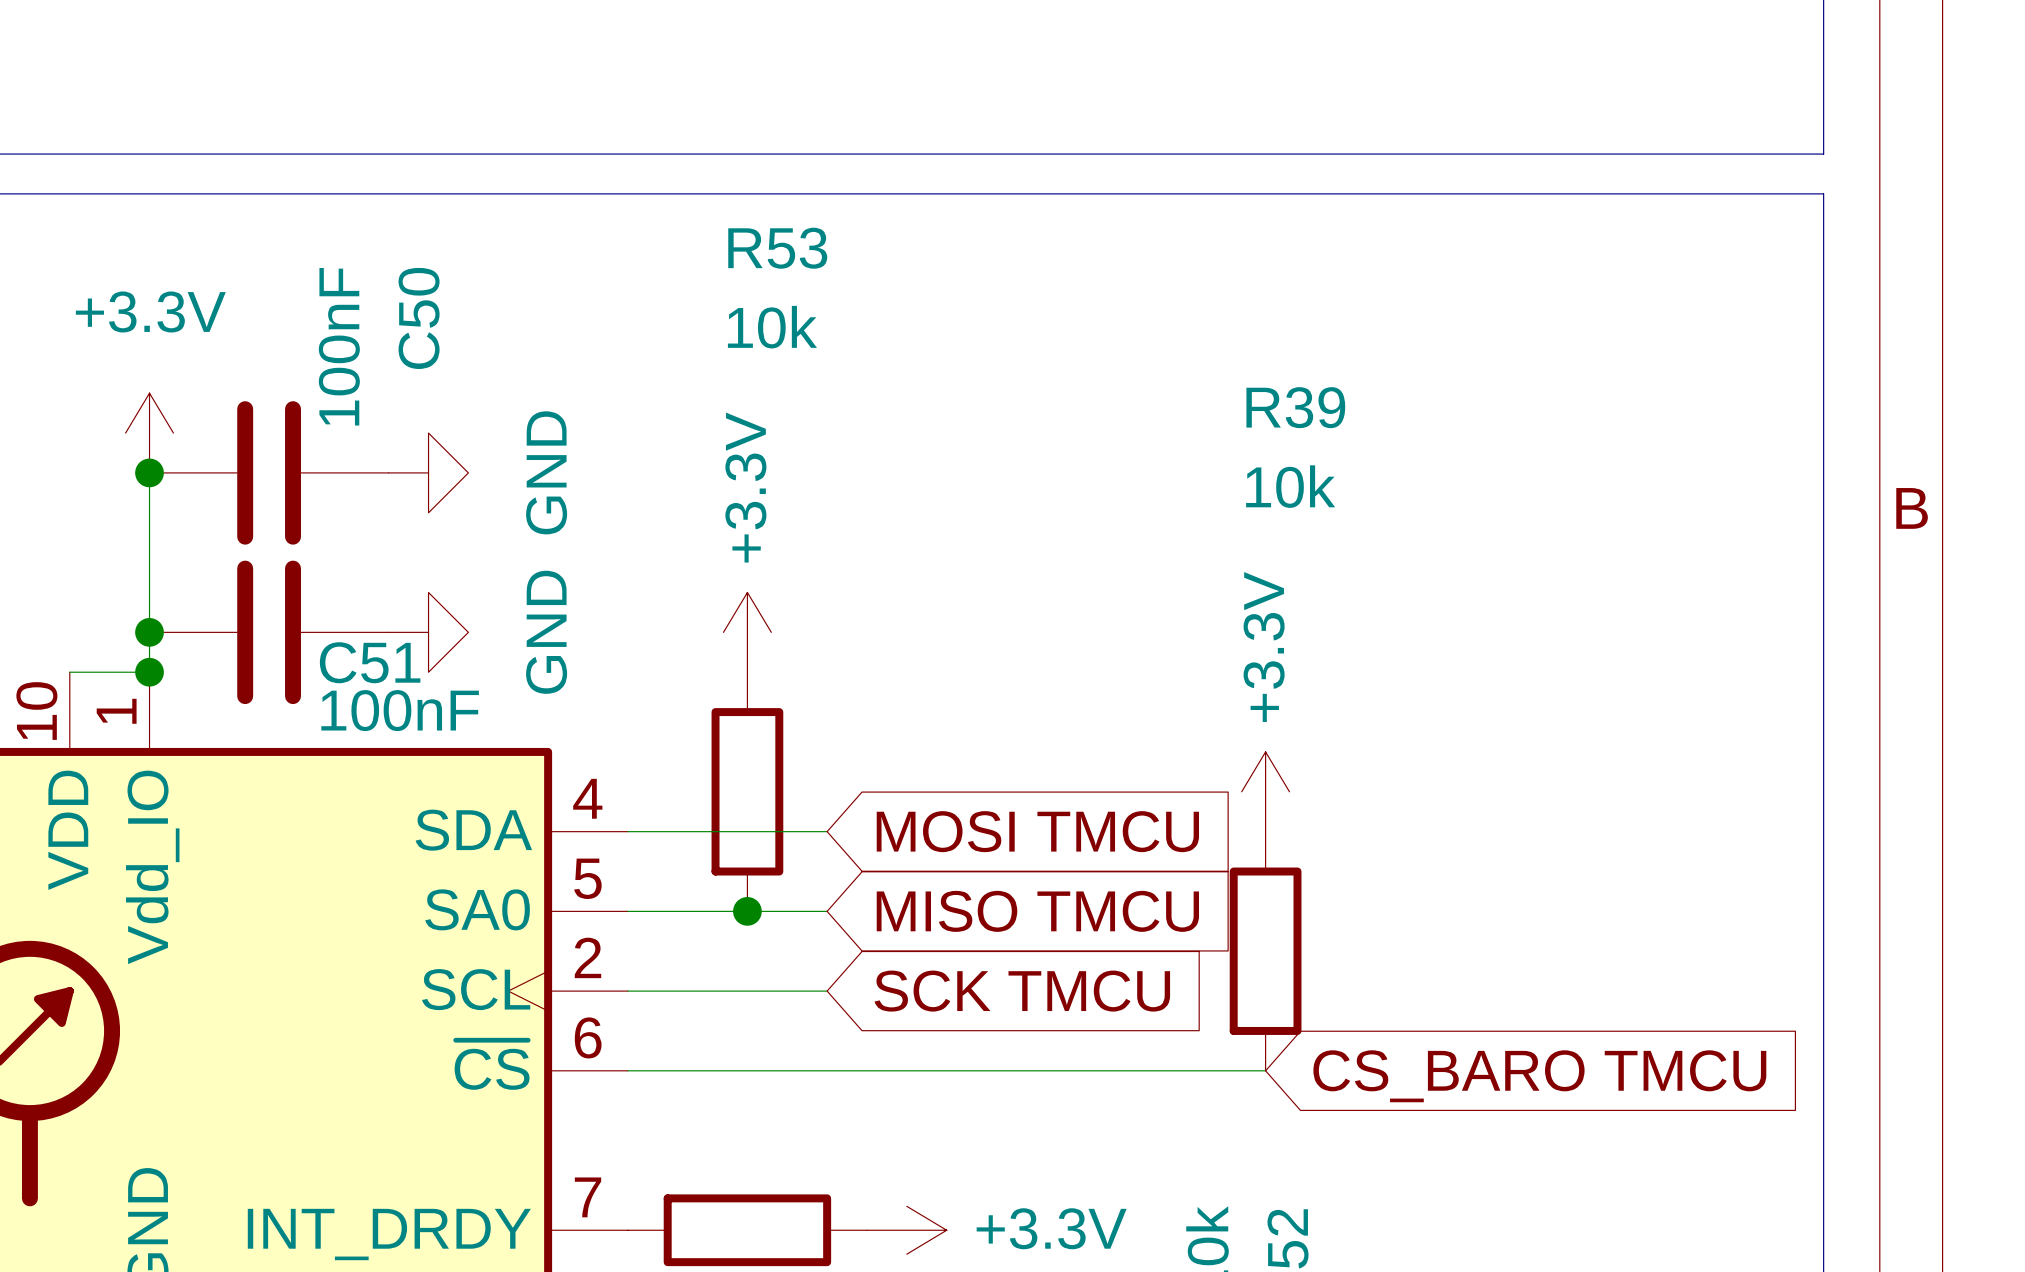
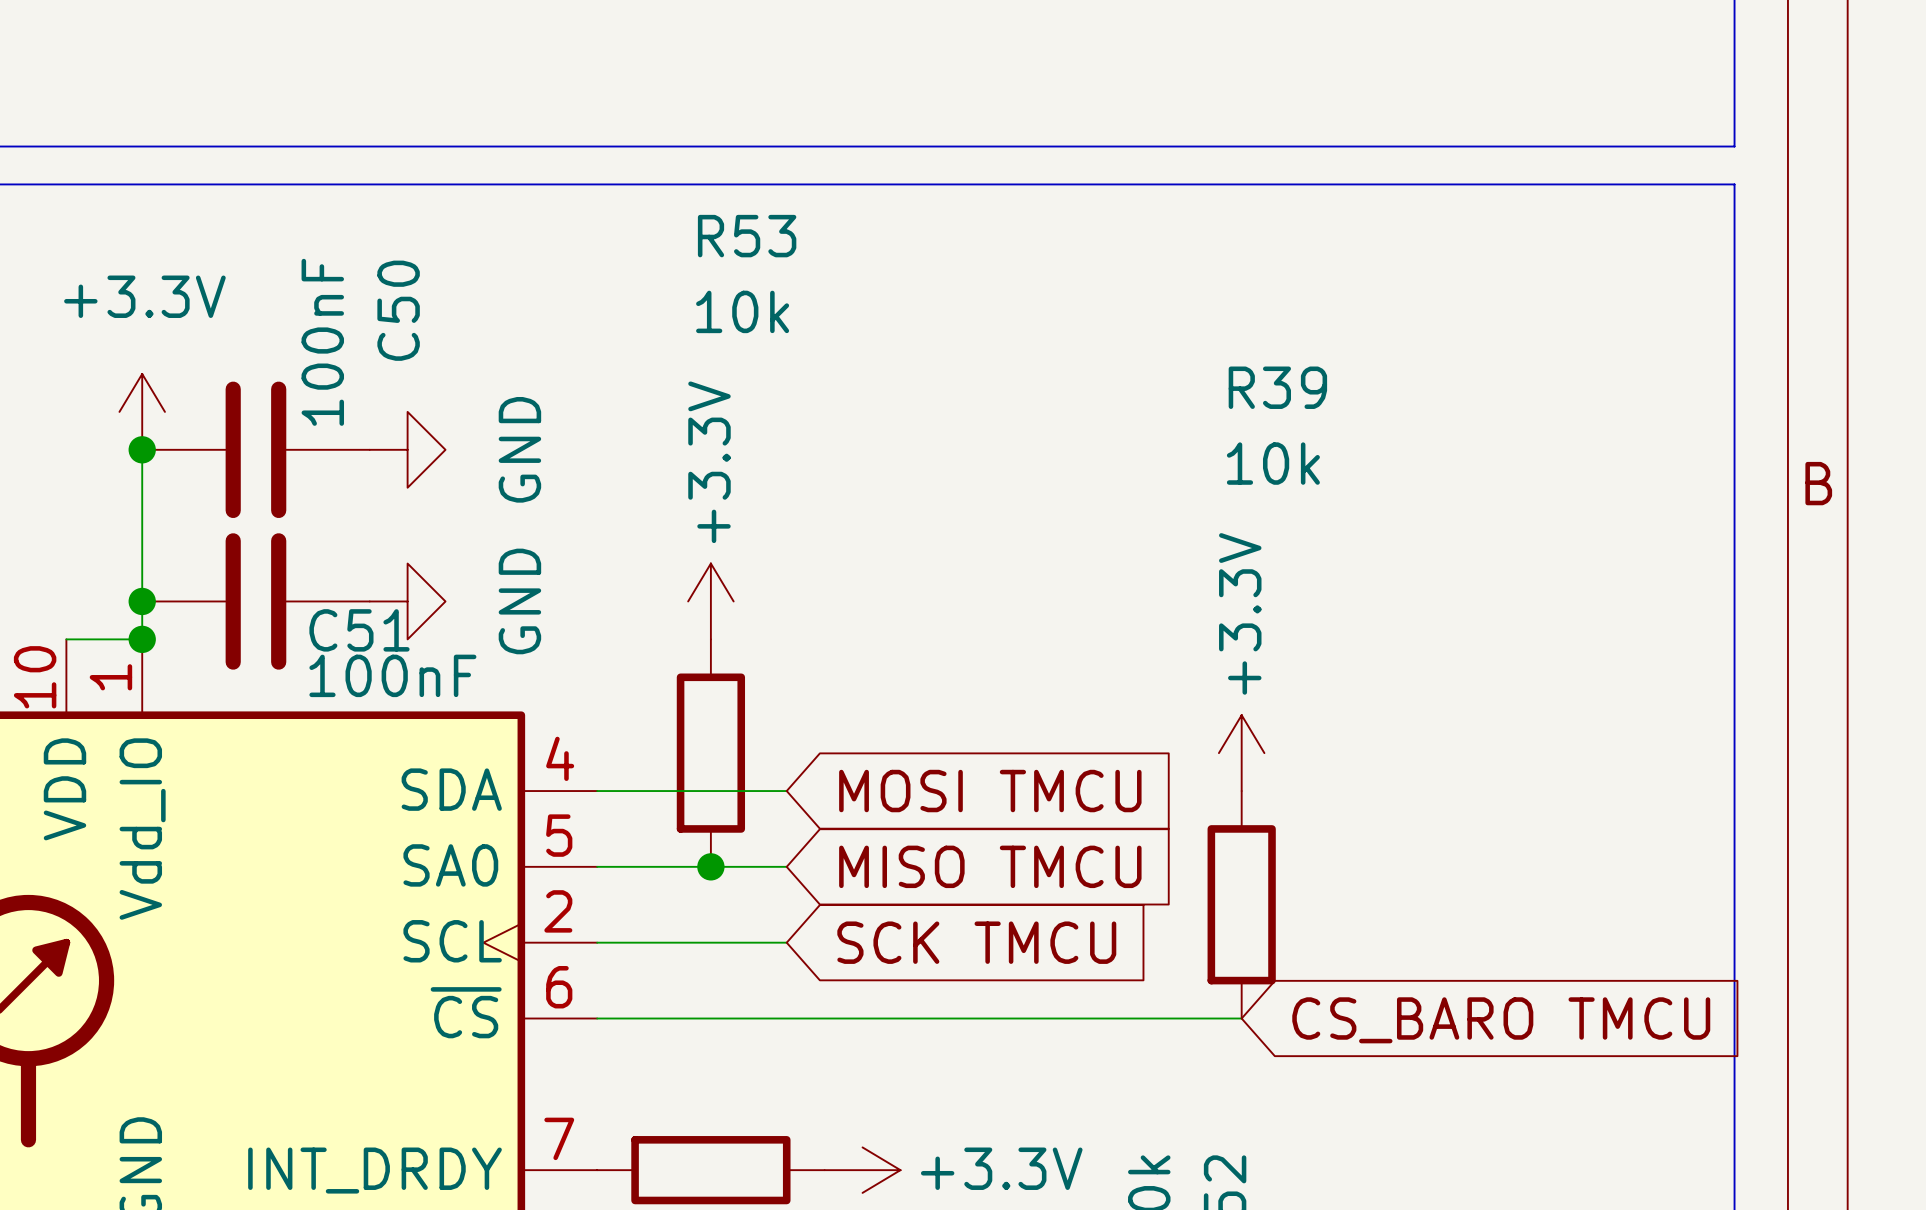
power symbol position: +3.3V (1265, 791) -> +3.3V (1241, 753)
R39 position: (1265, 951) -> (1241, 904)
wire: none -> (1203, 1018) (1241, 1018)
global label position: CS_BARO TMCU (1539, 1076) -> CS_BARO TMCU (1501, 1020)

